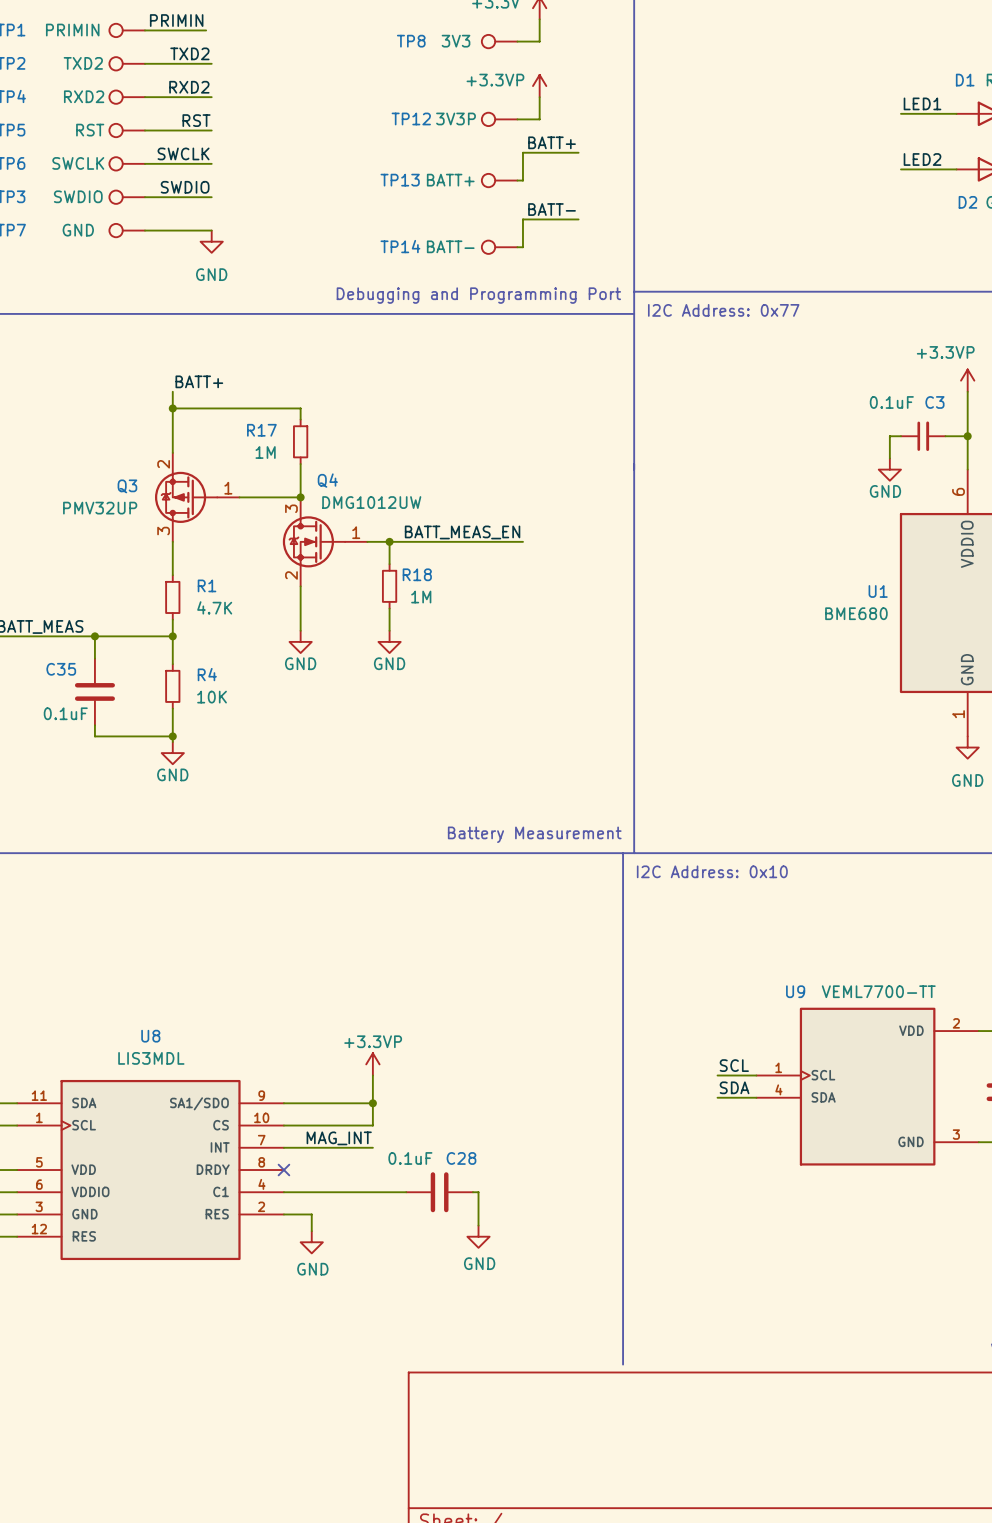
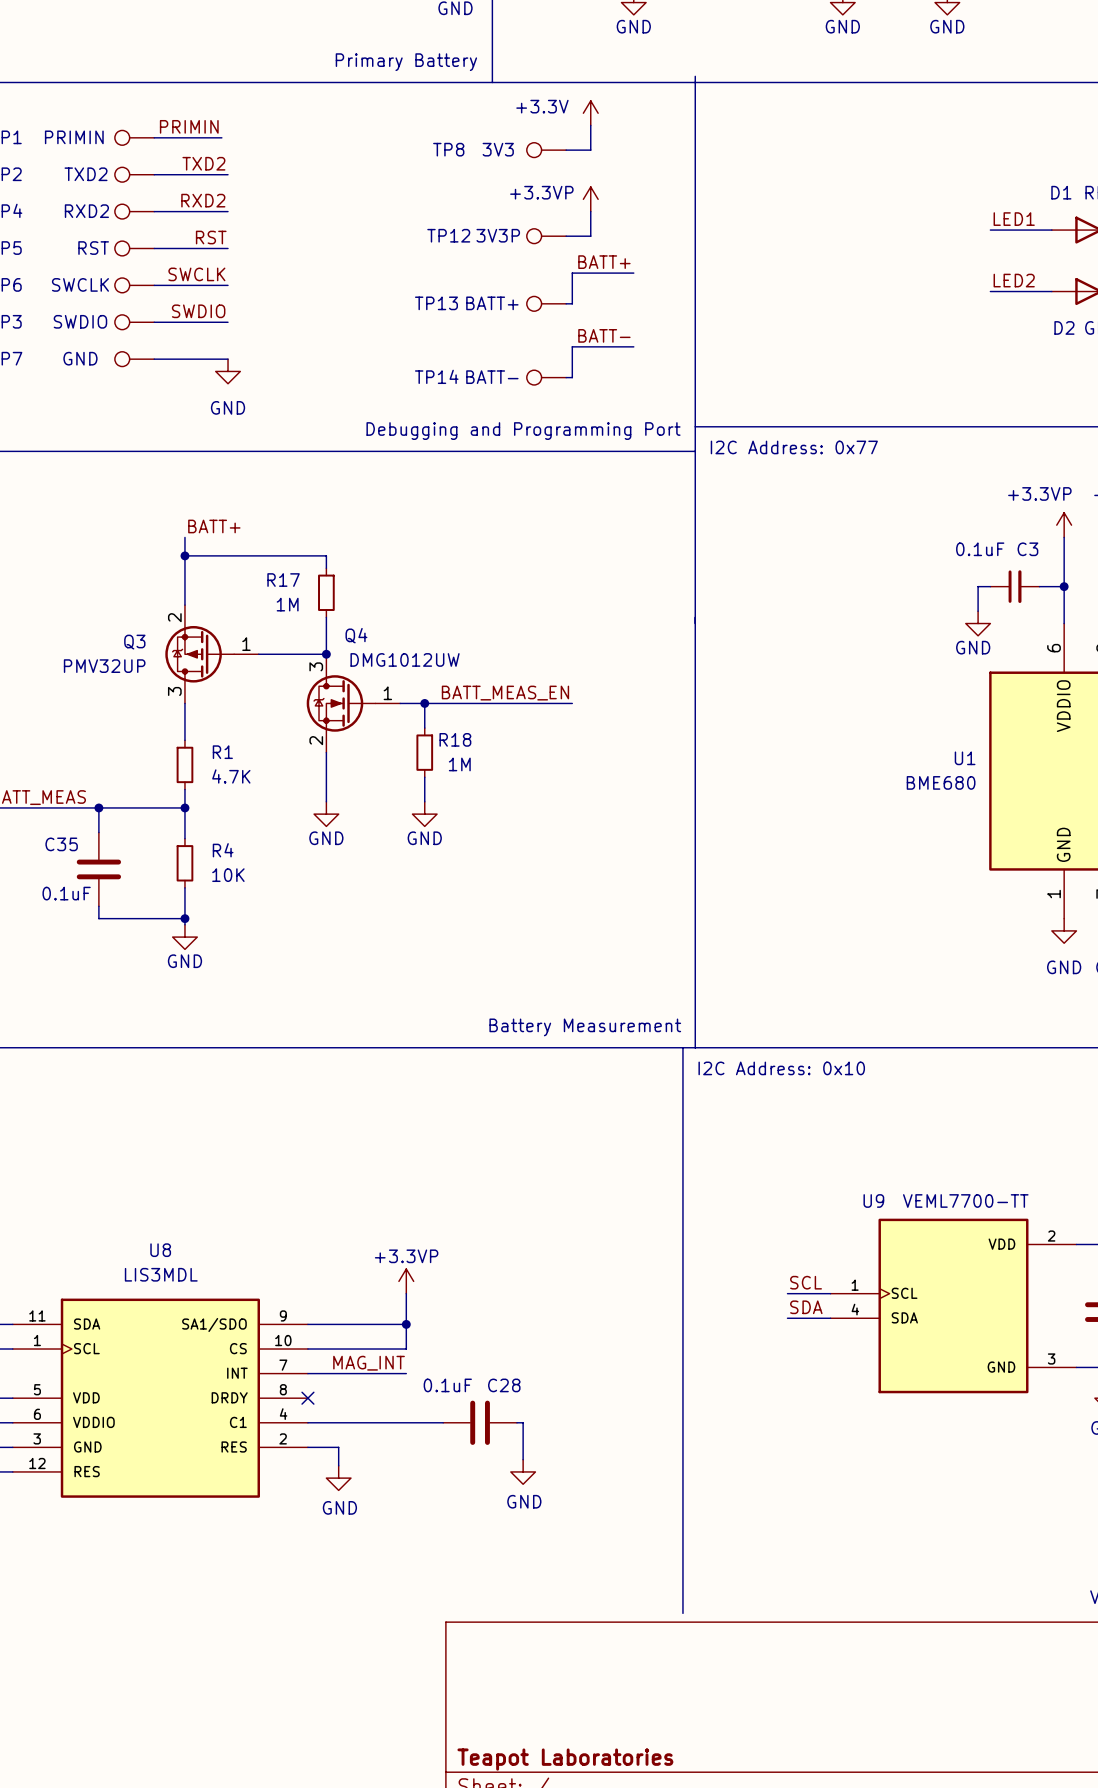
title block: none -> Teapot Laboratories (565, 1759)

